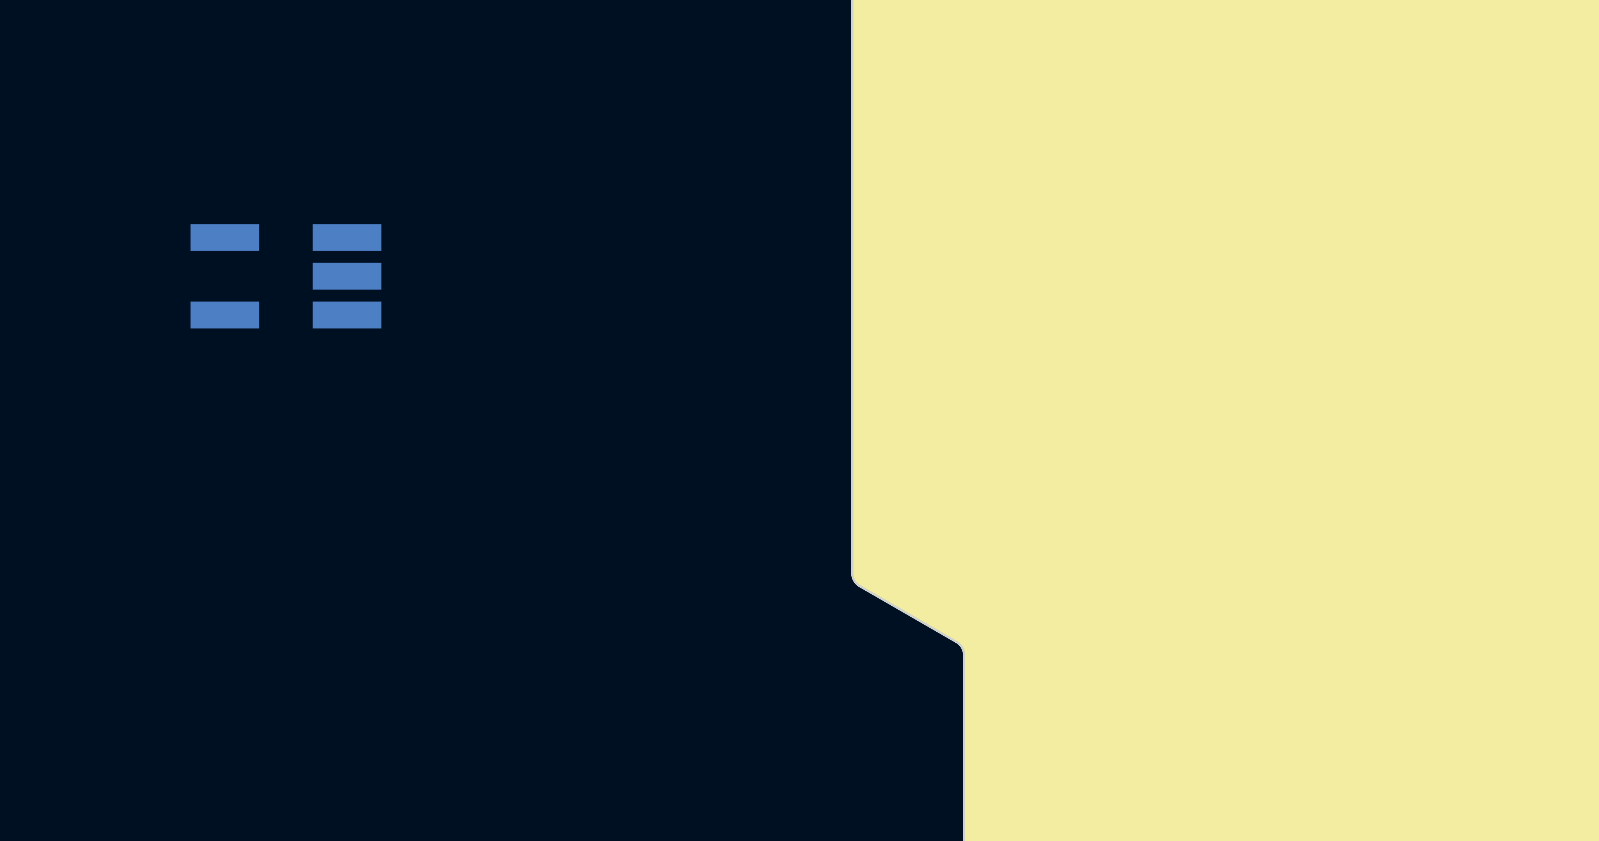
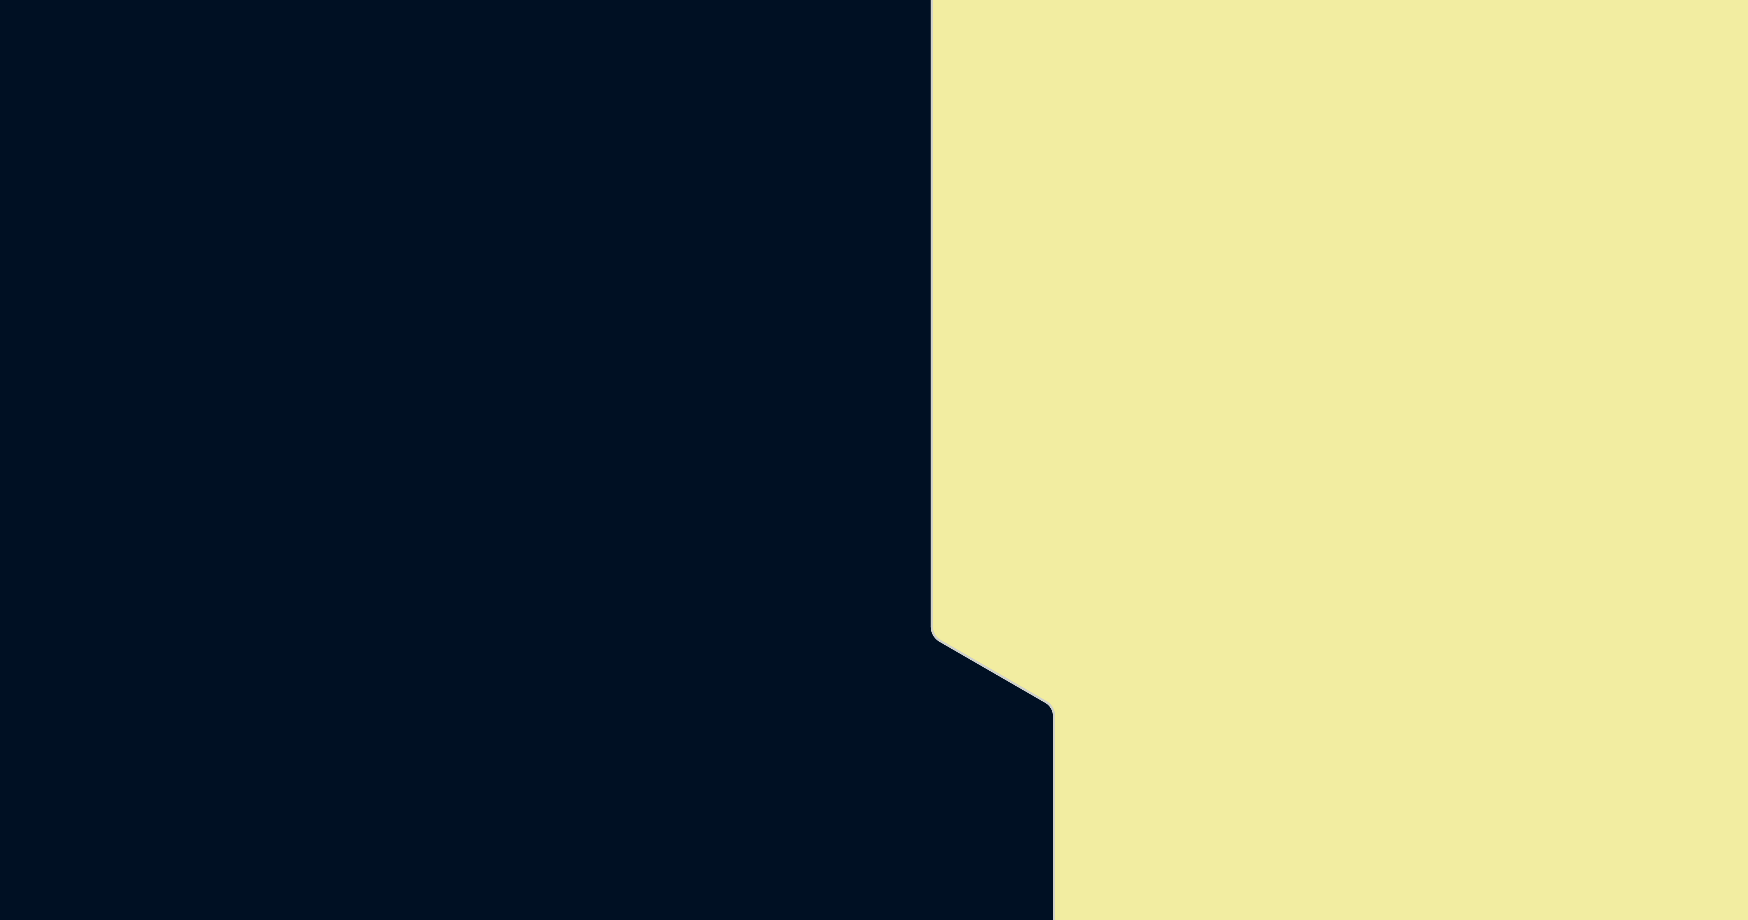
part: (285, 276) -> none

